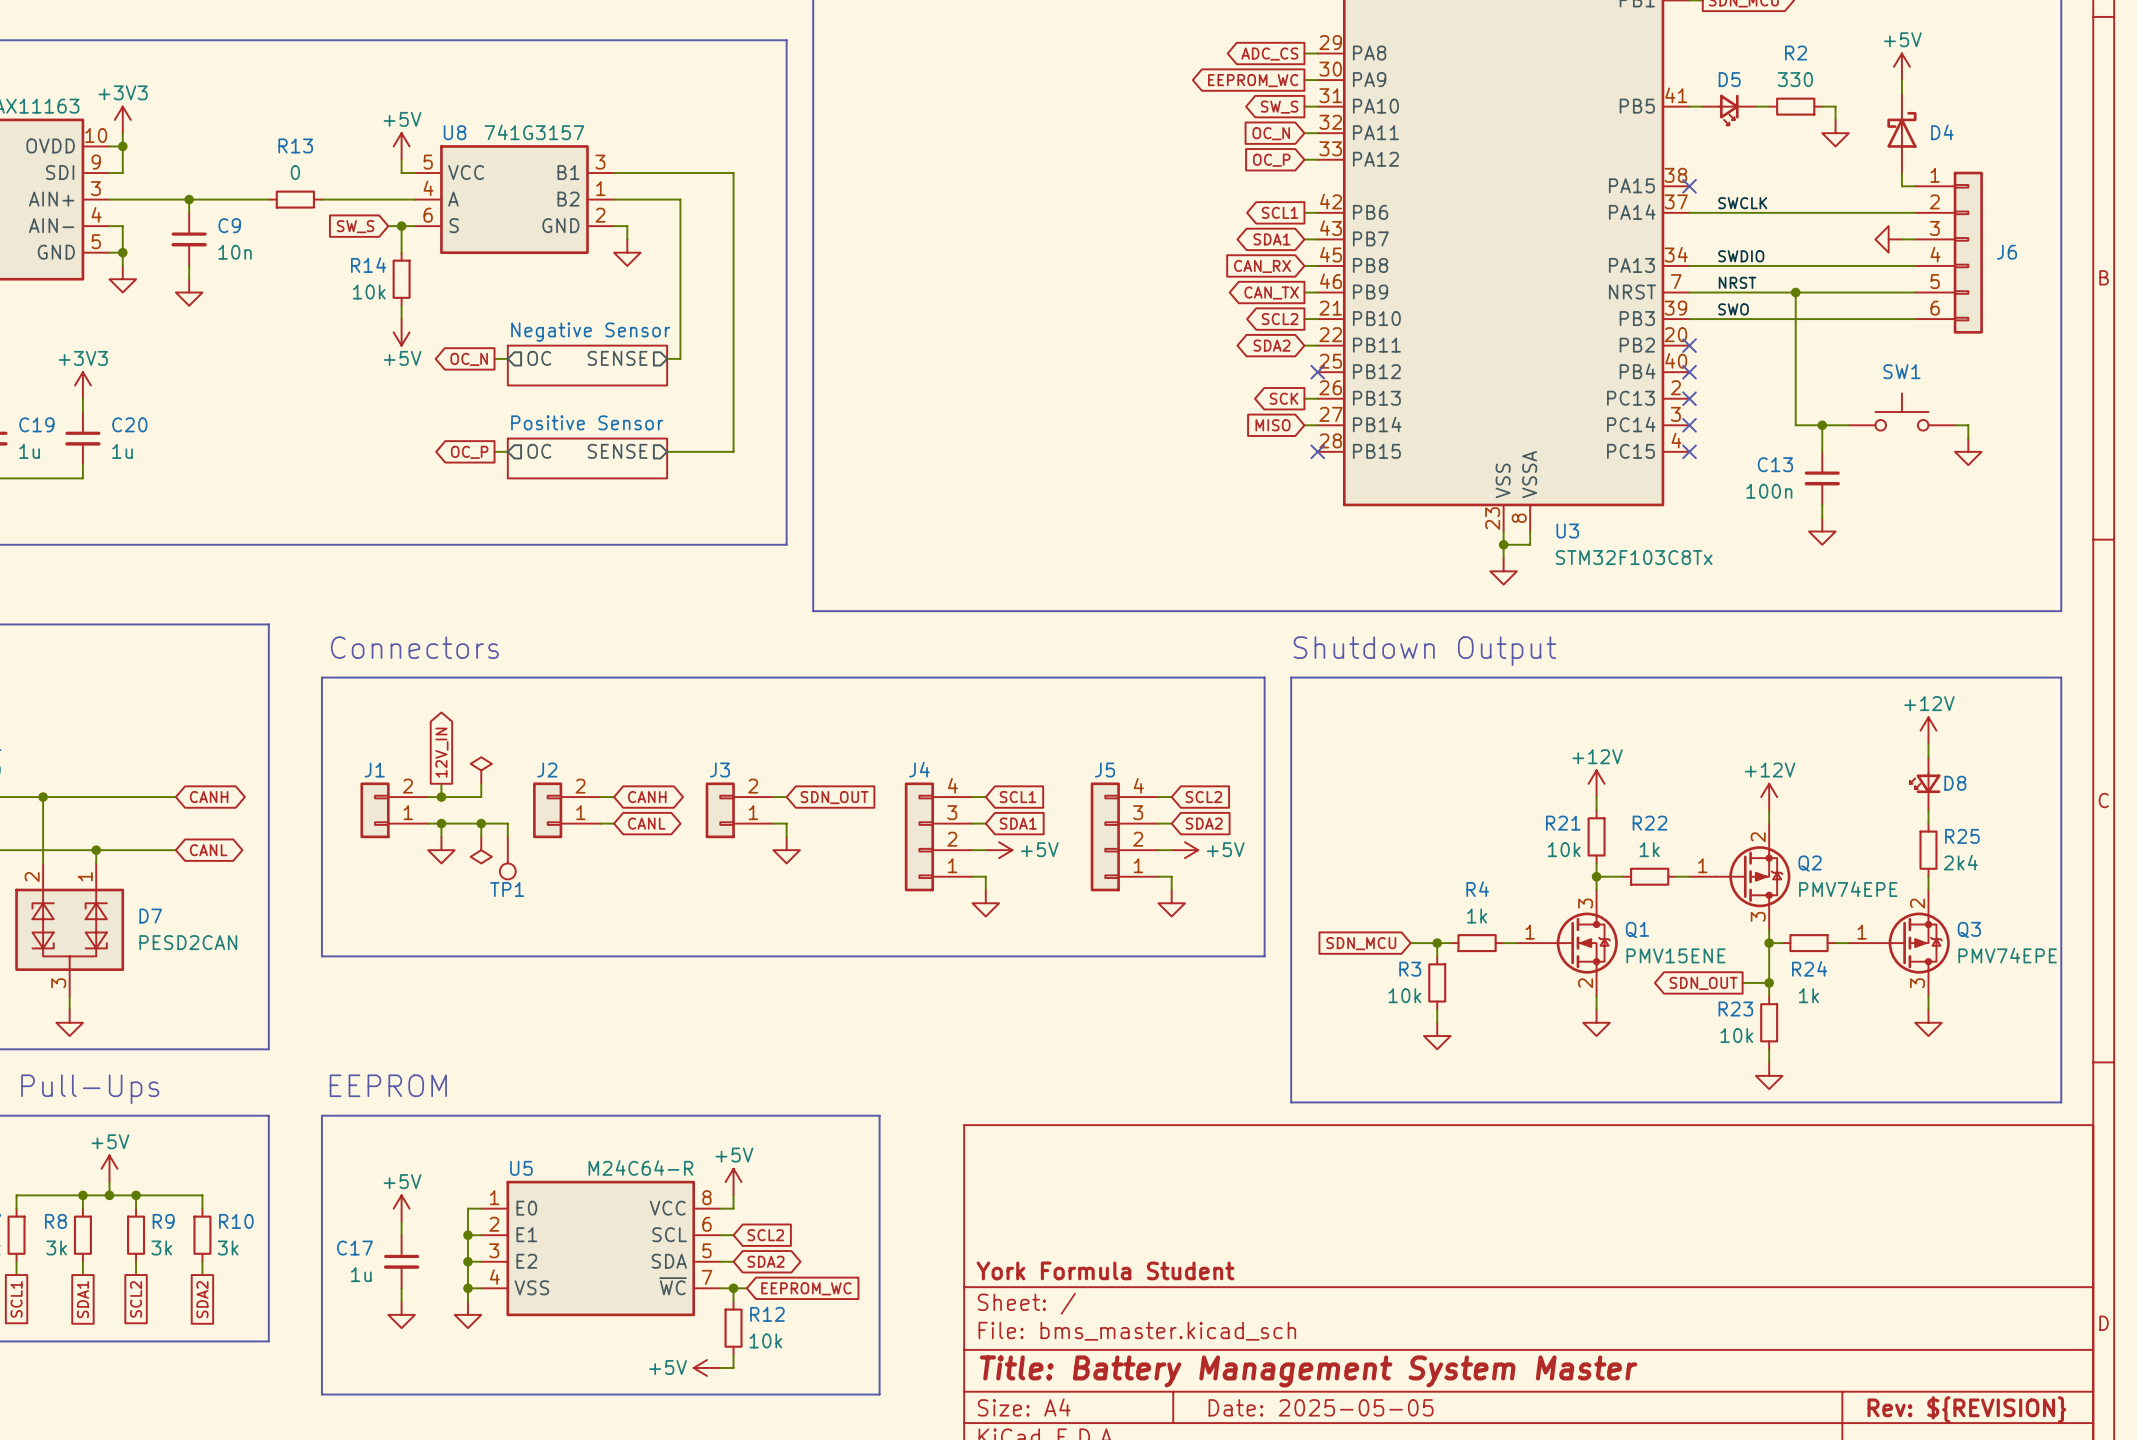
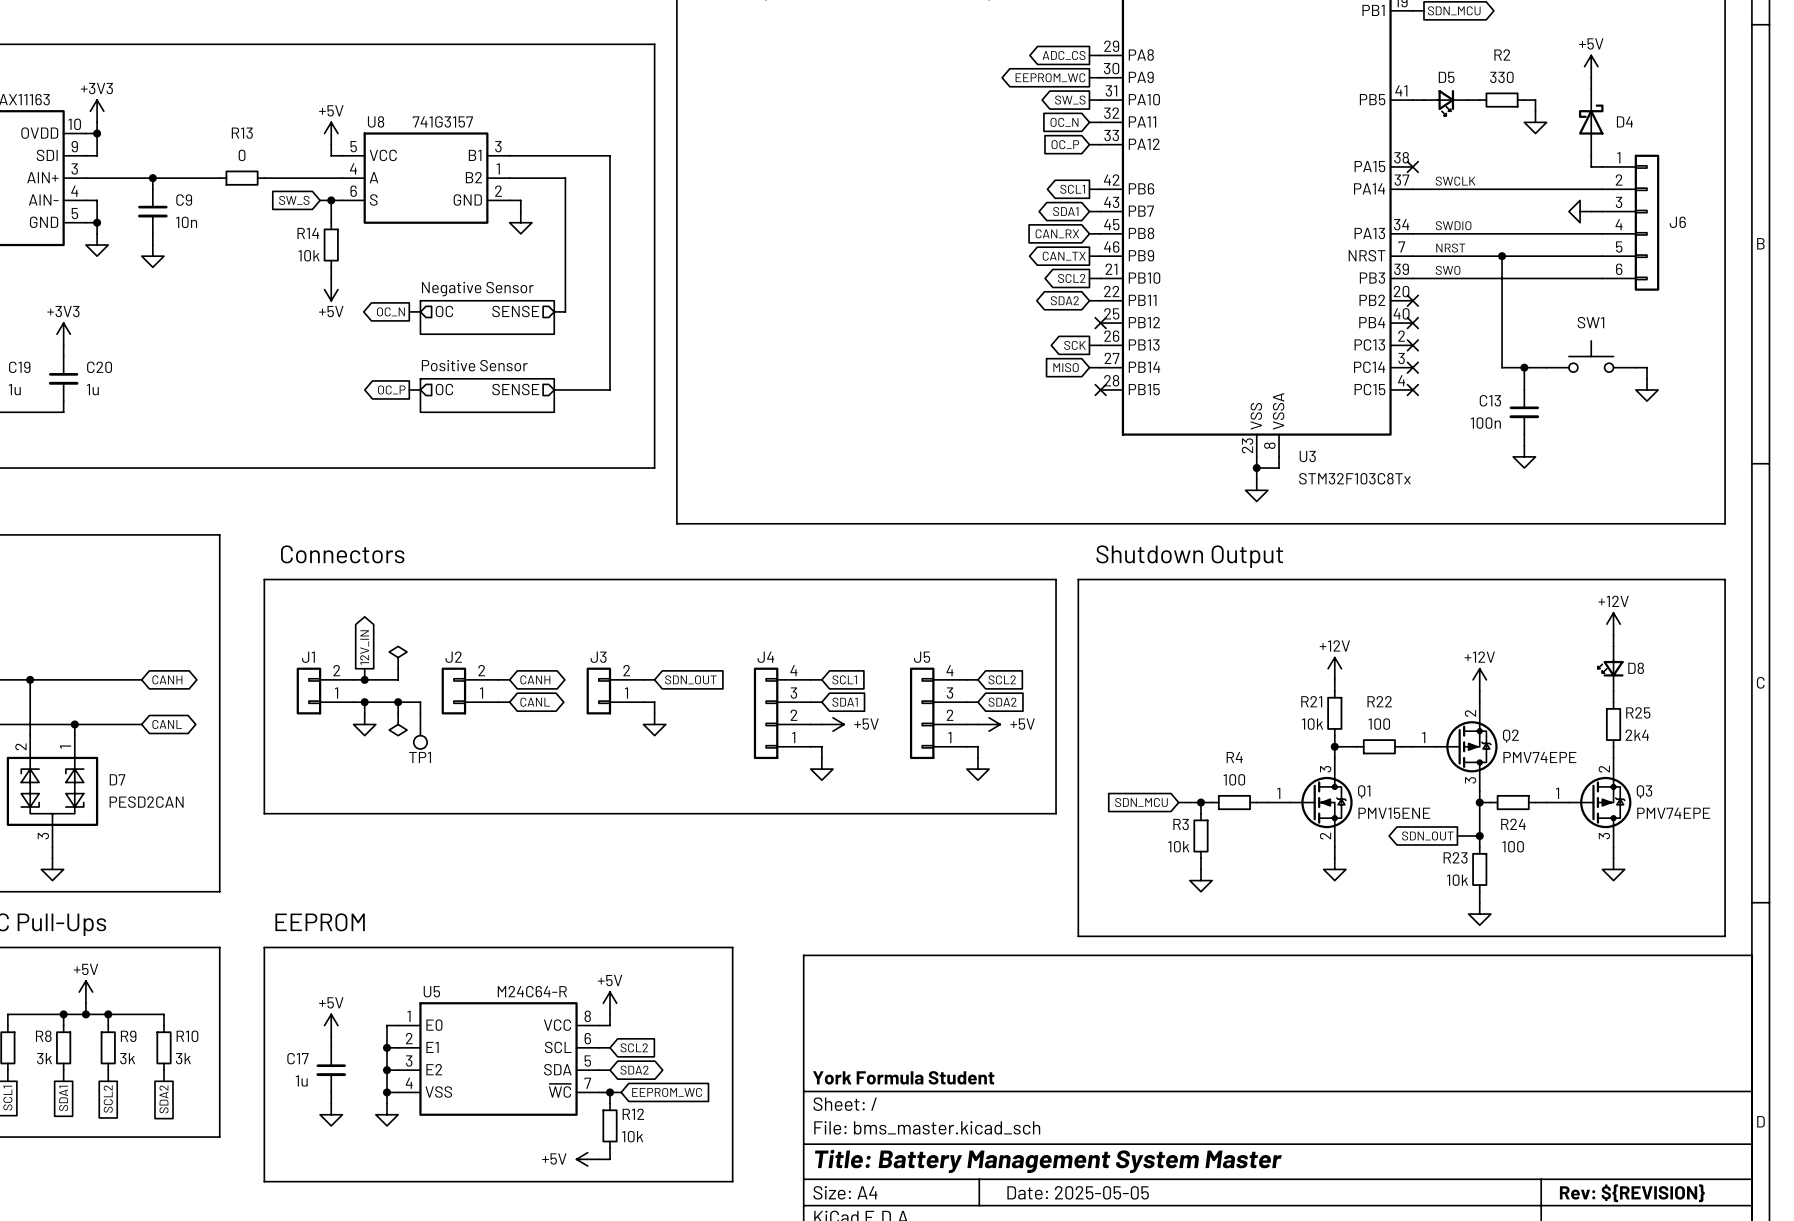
R22 value: 1k (1649, 849) -> 100 (1379, 724)
R4 value: 1k (1477, 916) -> 100 (1234, 779)
R24 value: 1k (1809, 995) -> 100 (1513, 846)

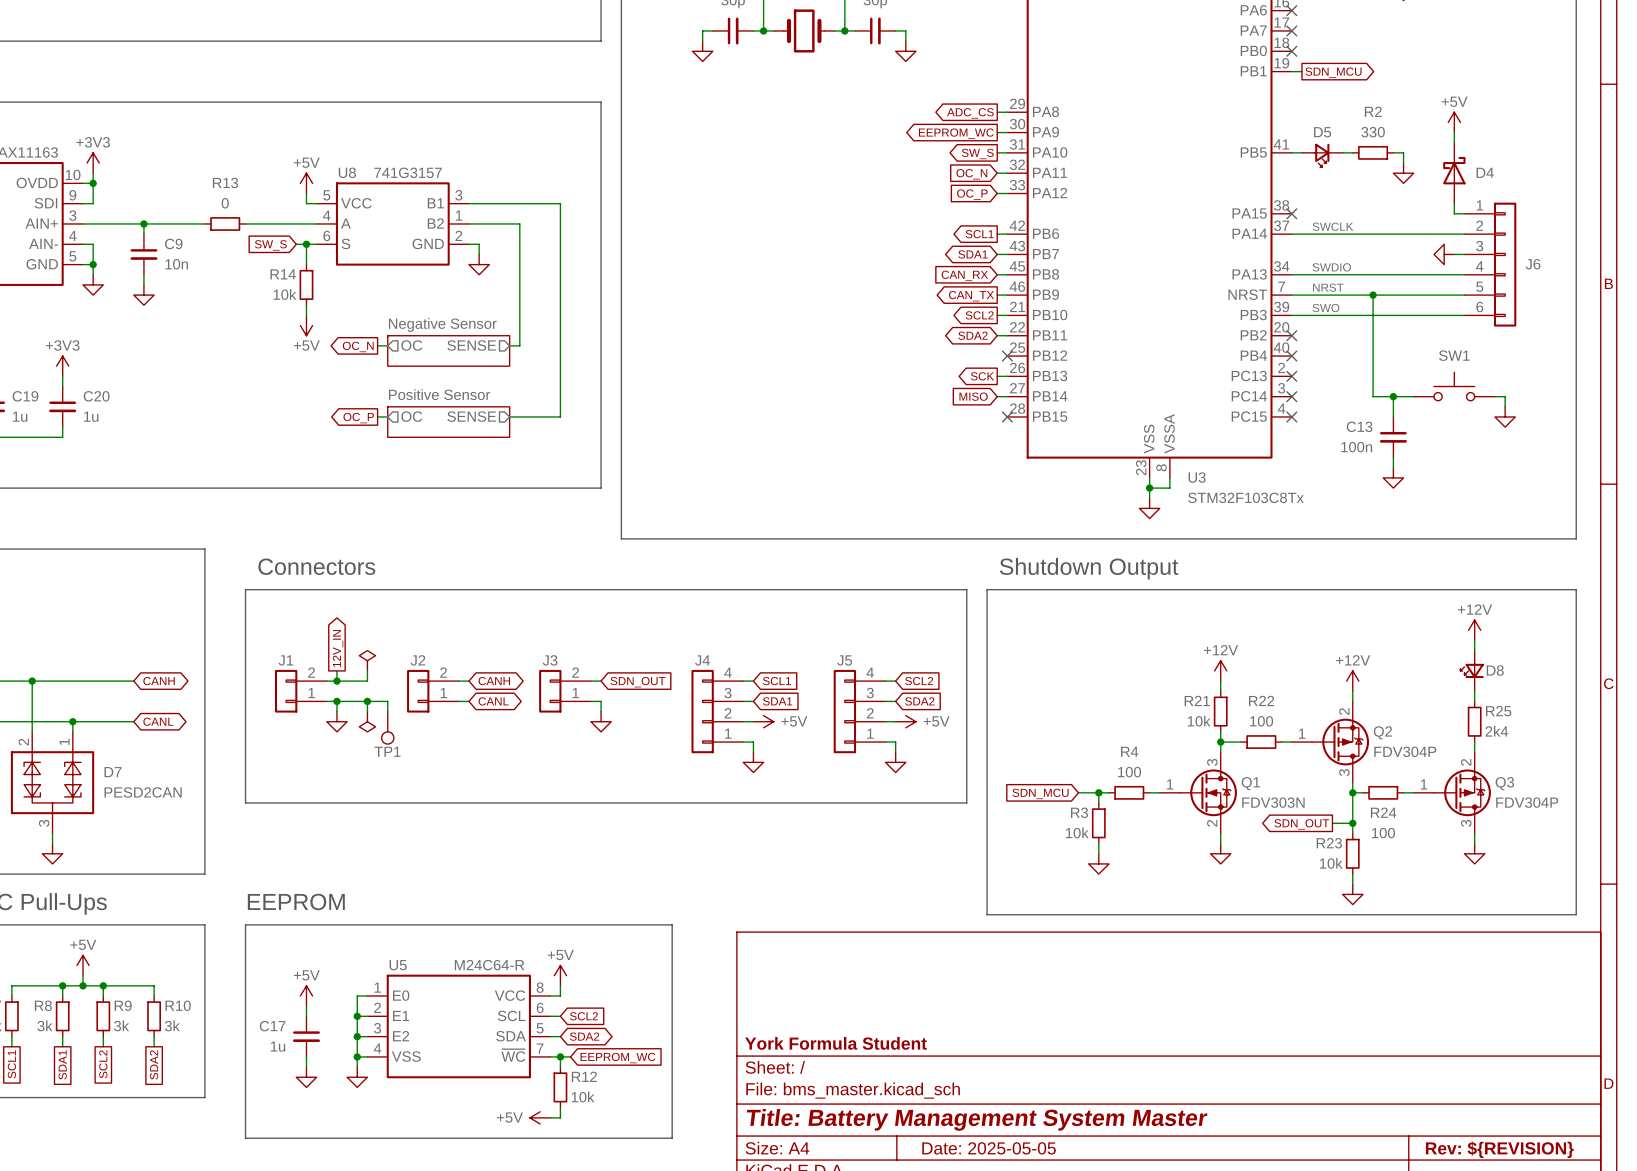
Q2 value: PMV74EPE (1539, 757) -> FDV304P (1405, 751)
Q1 value: PMV15ENE (1394, 813) -> FDV303N (1273, 802)
Q3 value: PMV74EPE (1673, 813) -> FDV304P (1527, 802)

